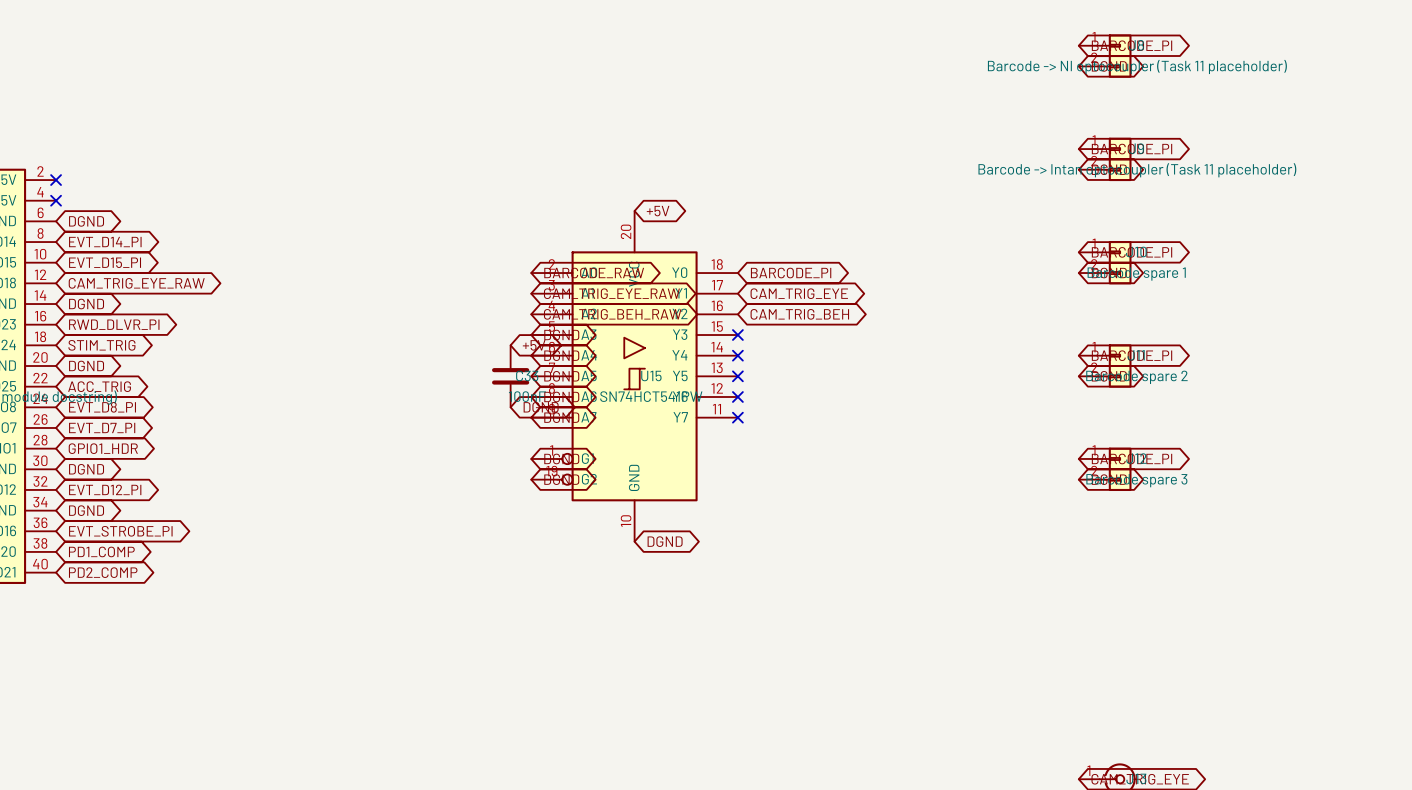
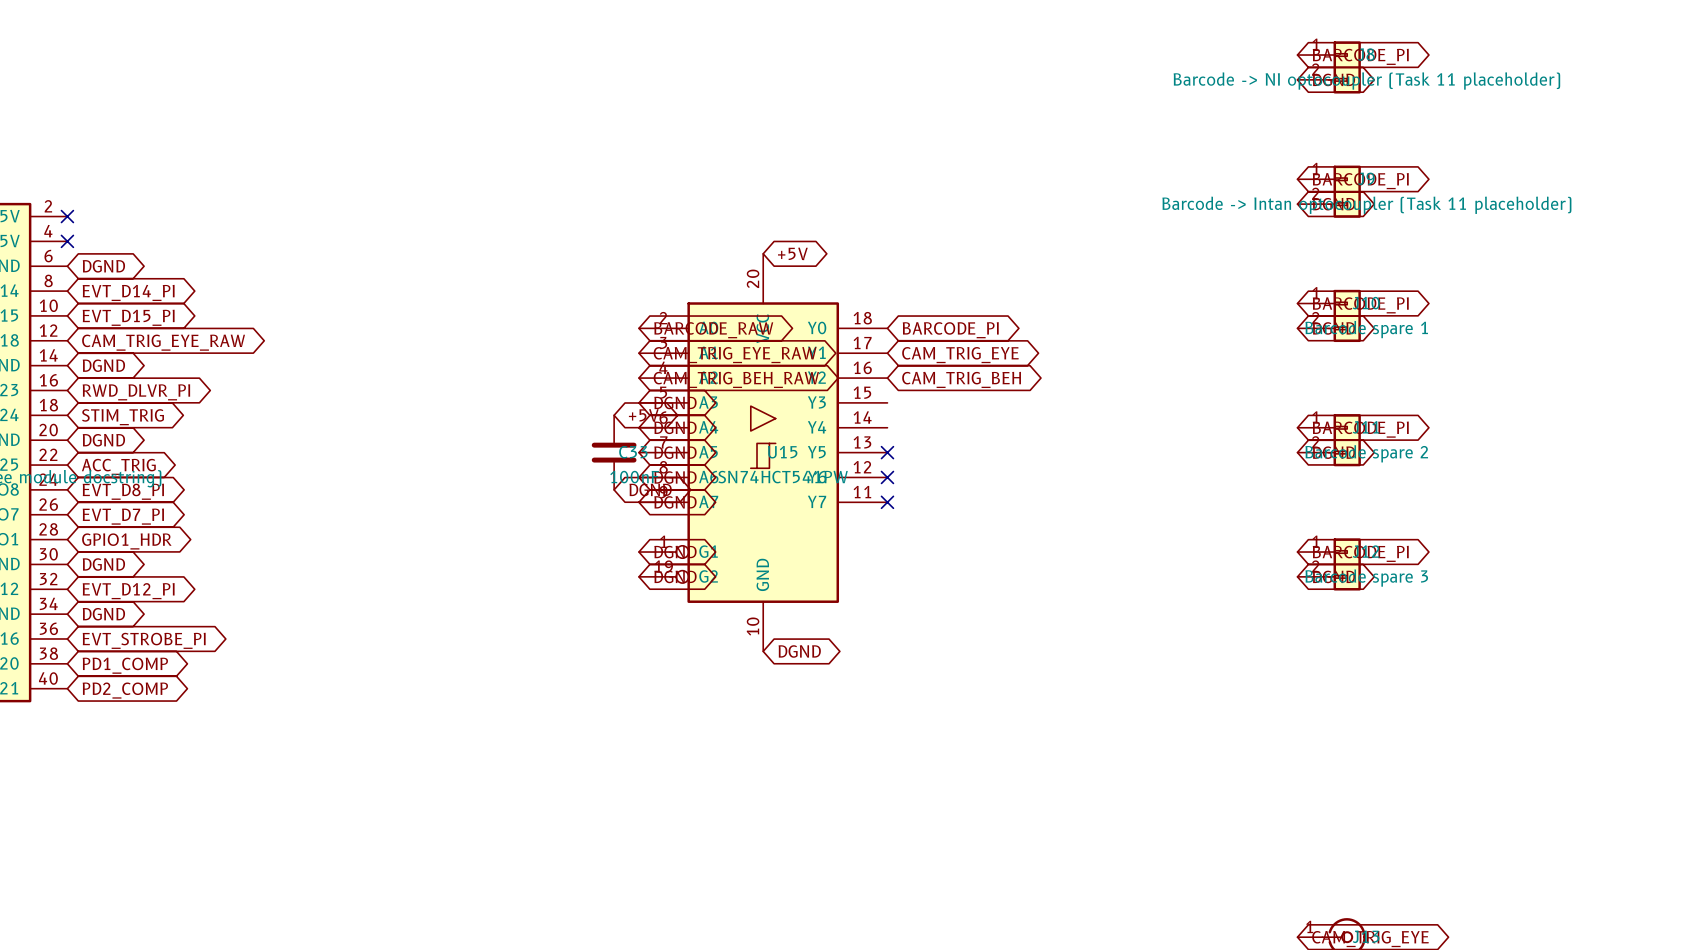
no-connect mark: (737, 335) -> none
no-connect mark: (737, 355) -> none

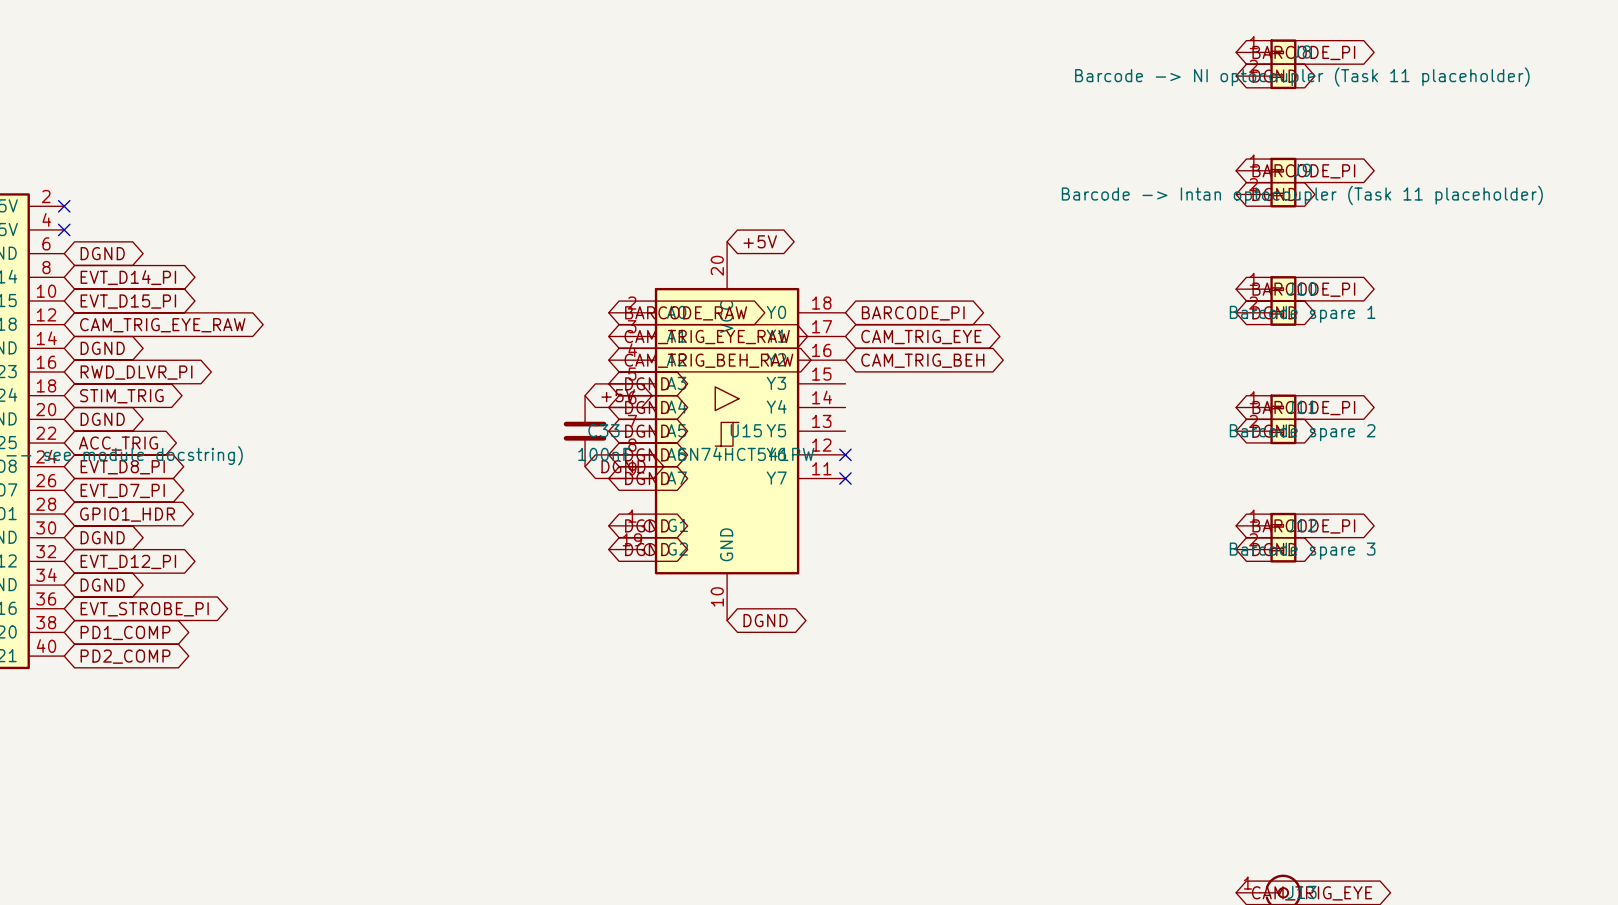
no-connect mark: (887, 452) -> none

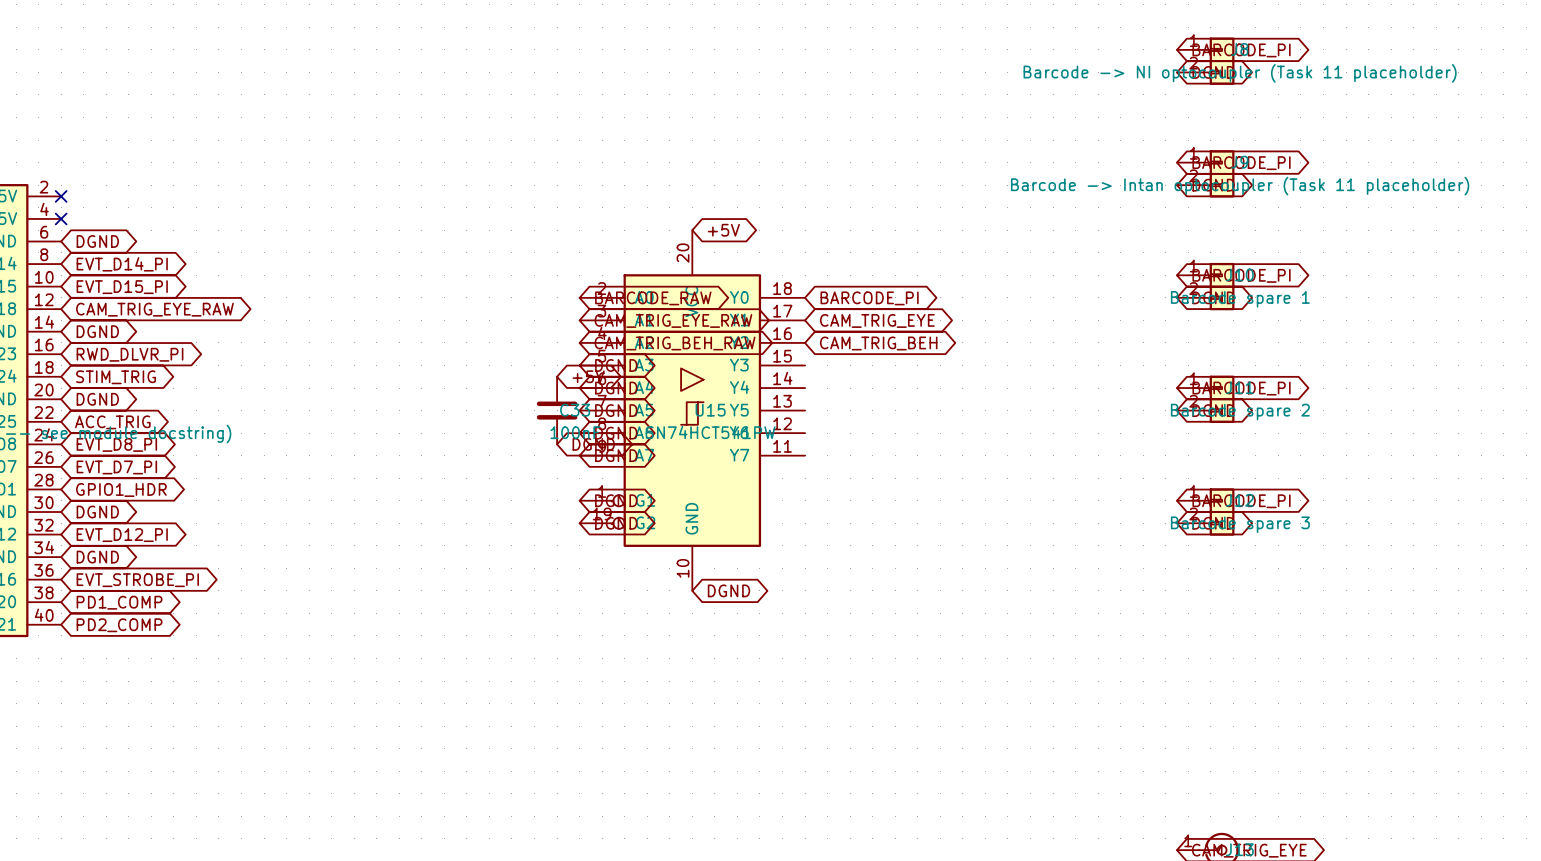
no-connect mark: (845, 454) -> none
no-connect mark: (845, 478) -> none

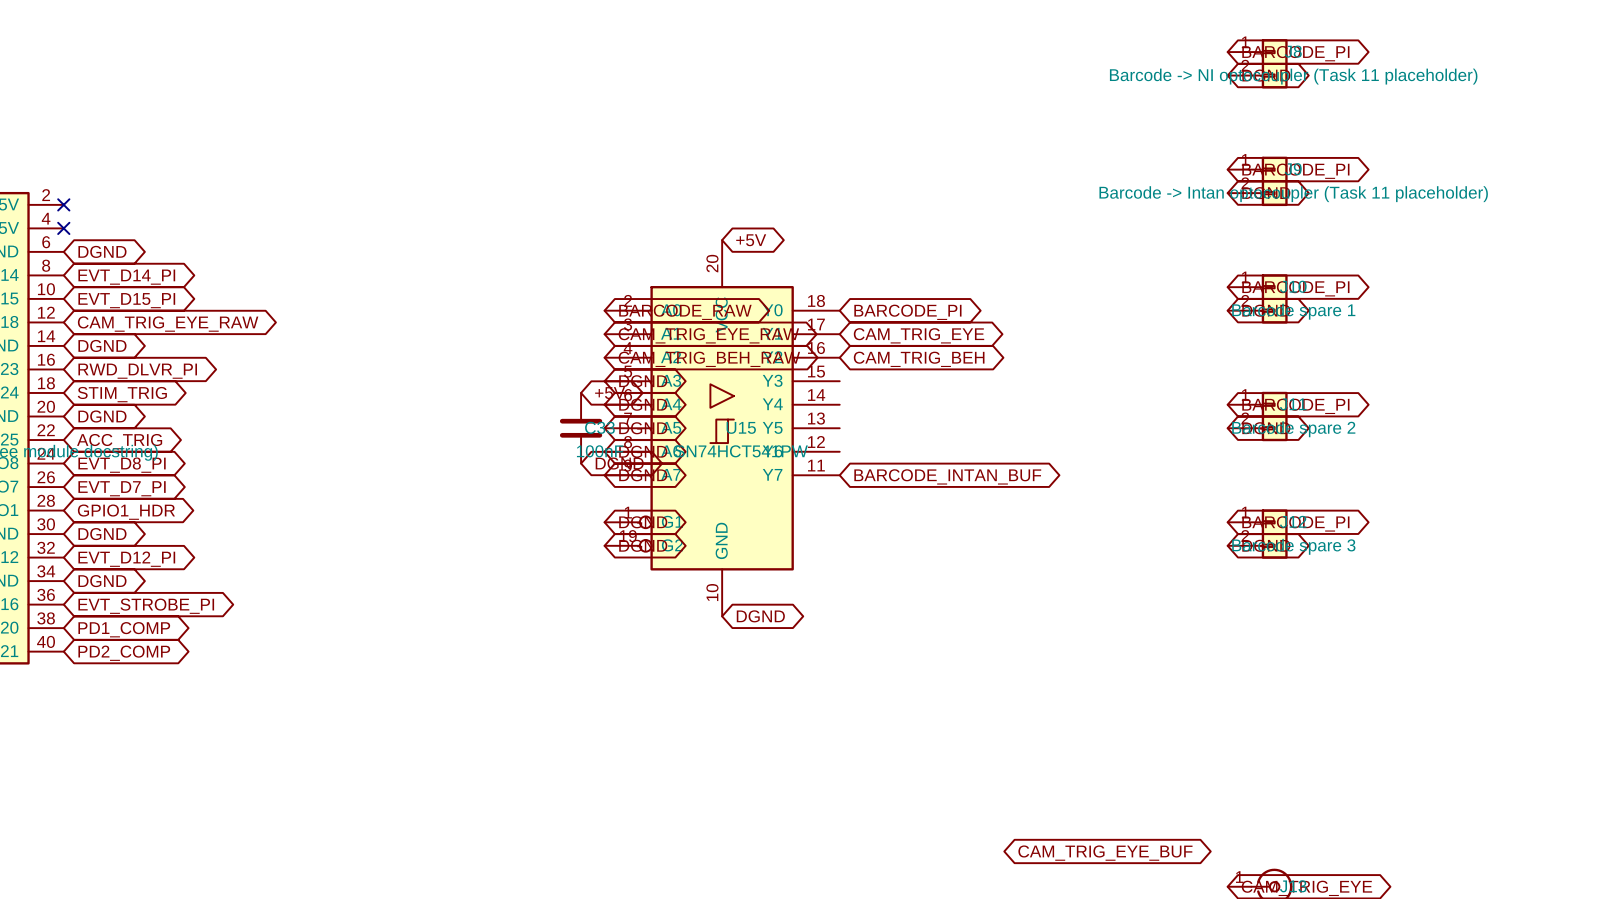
global label: none -> BARCODE_INTAN_BUF (947, 476)
global label: none -> CAM_TRIG_EYE_BUF (1105, 853)

